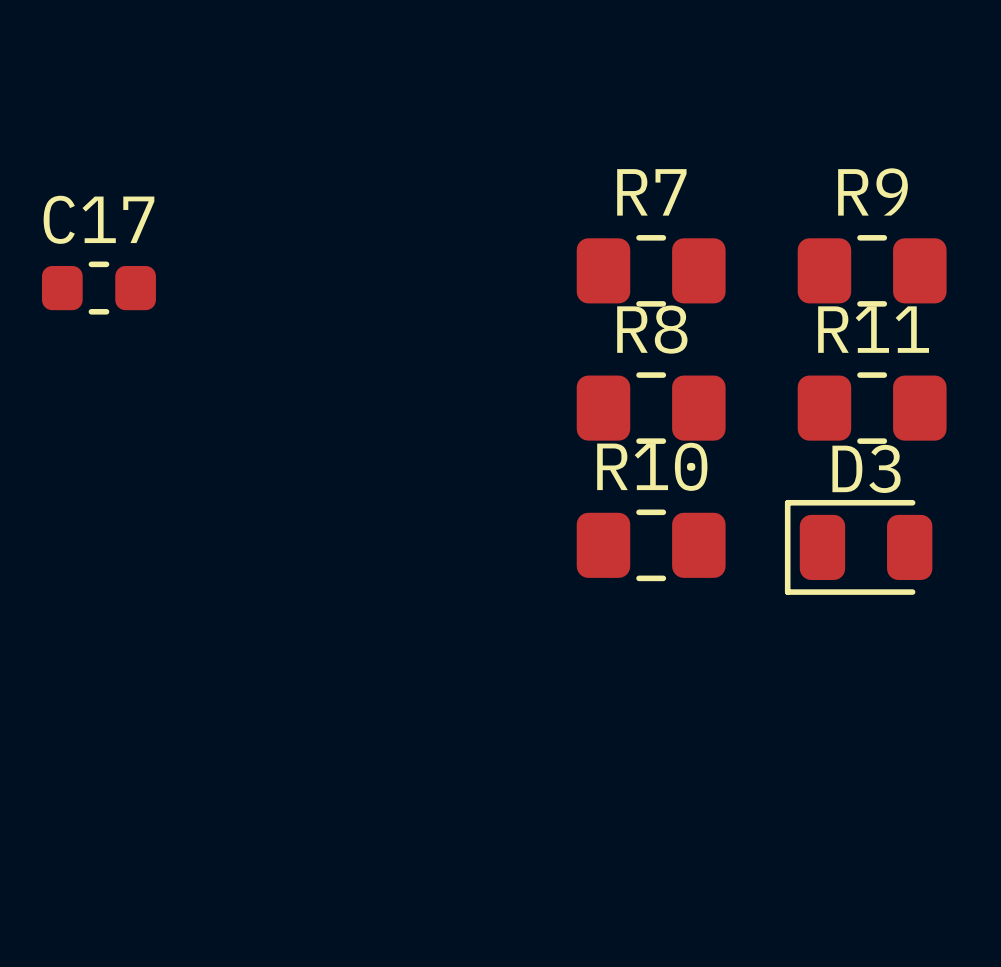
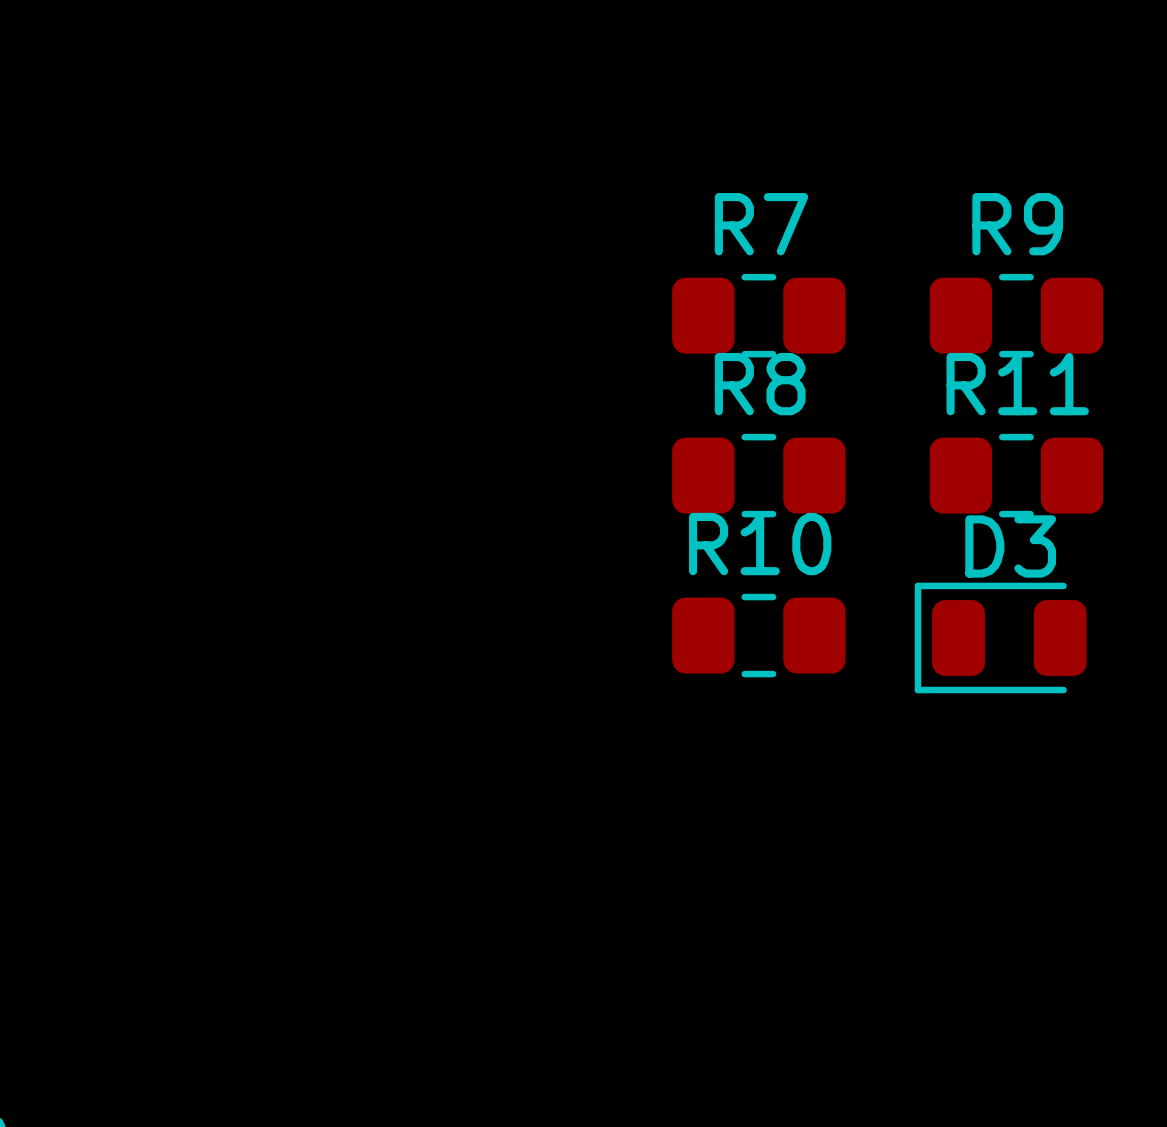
C17: (98, 288) -> none

